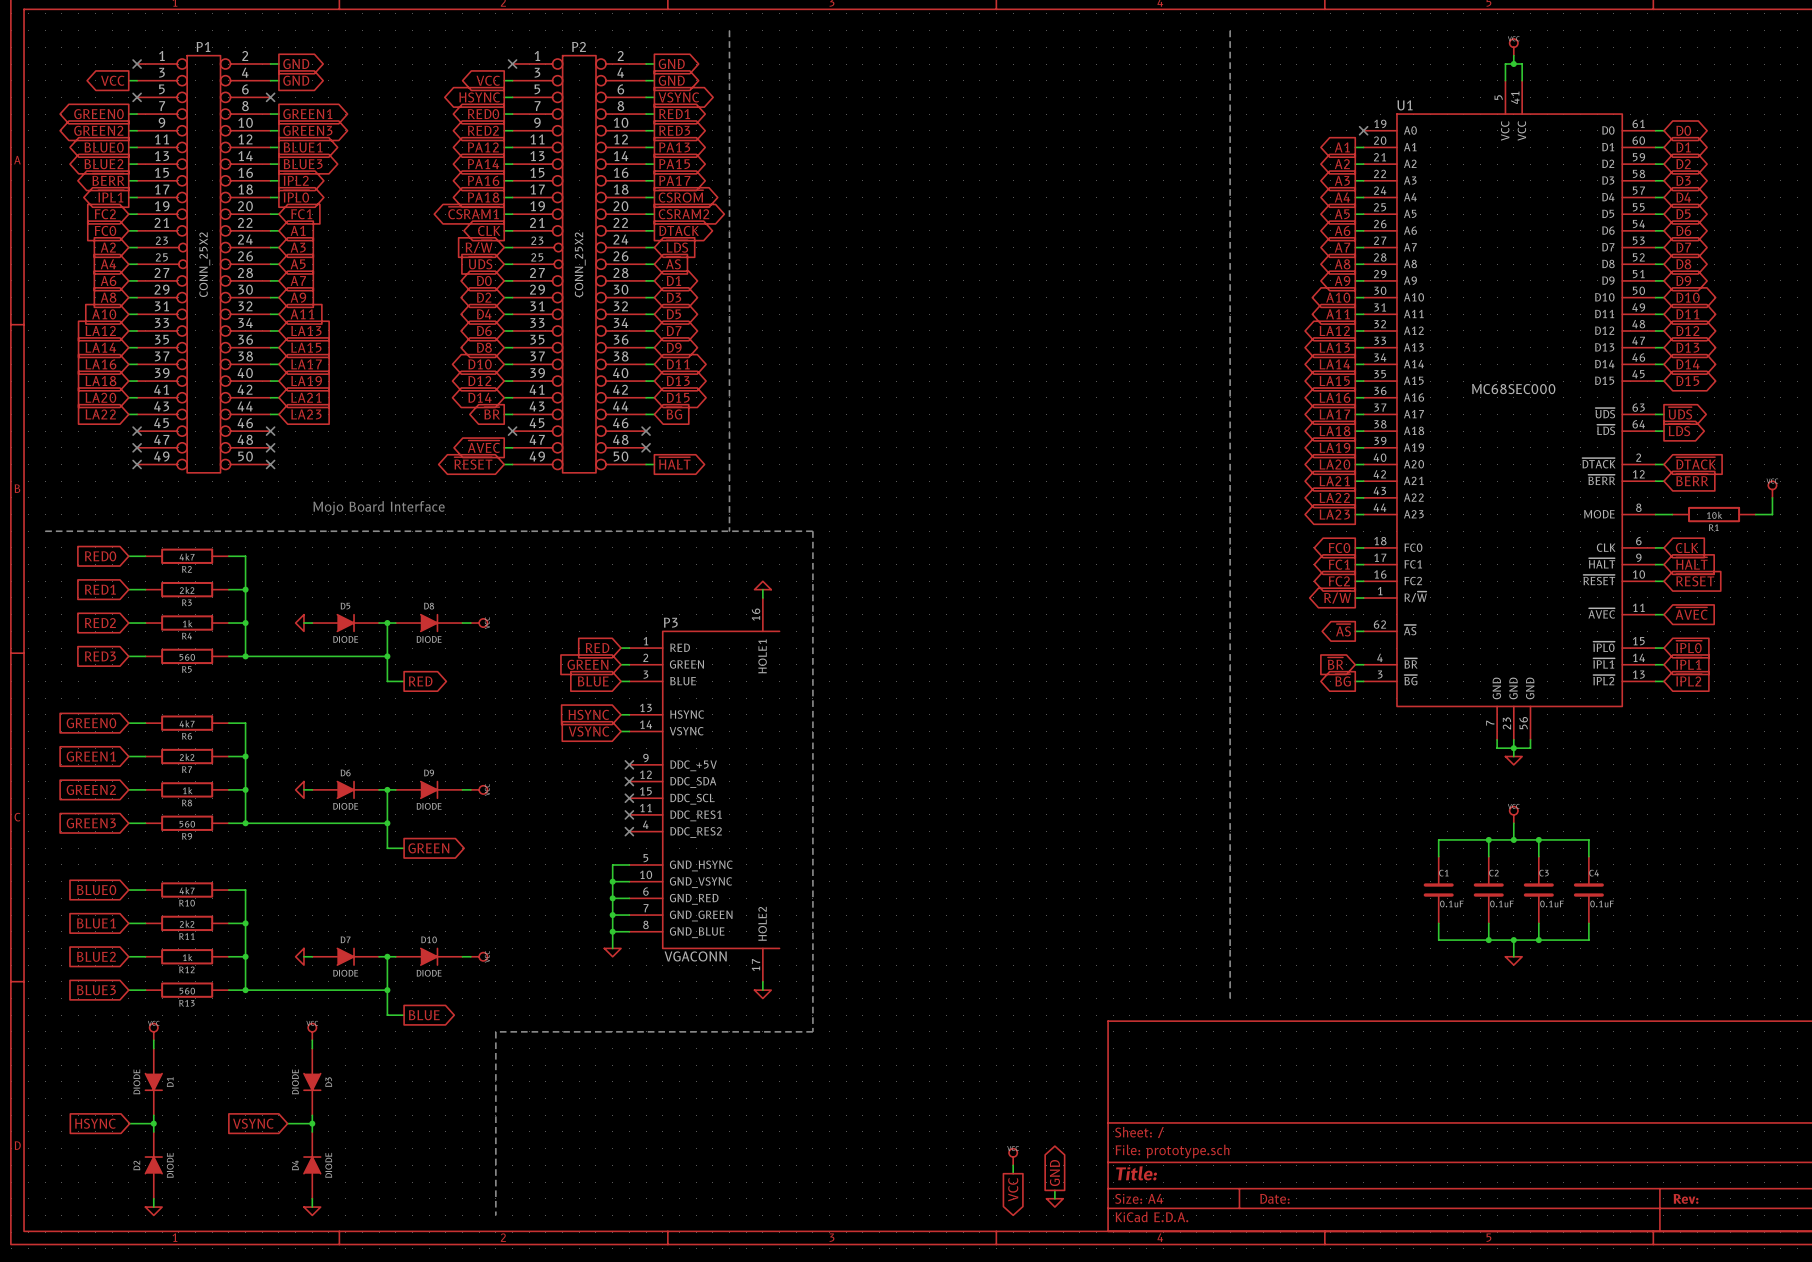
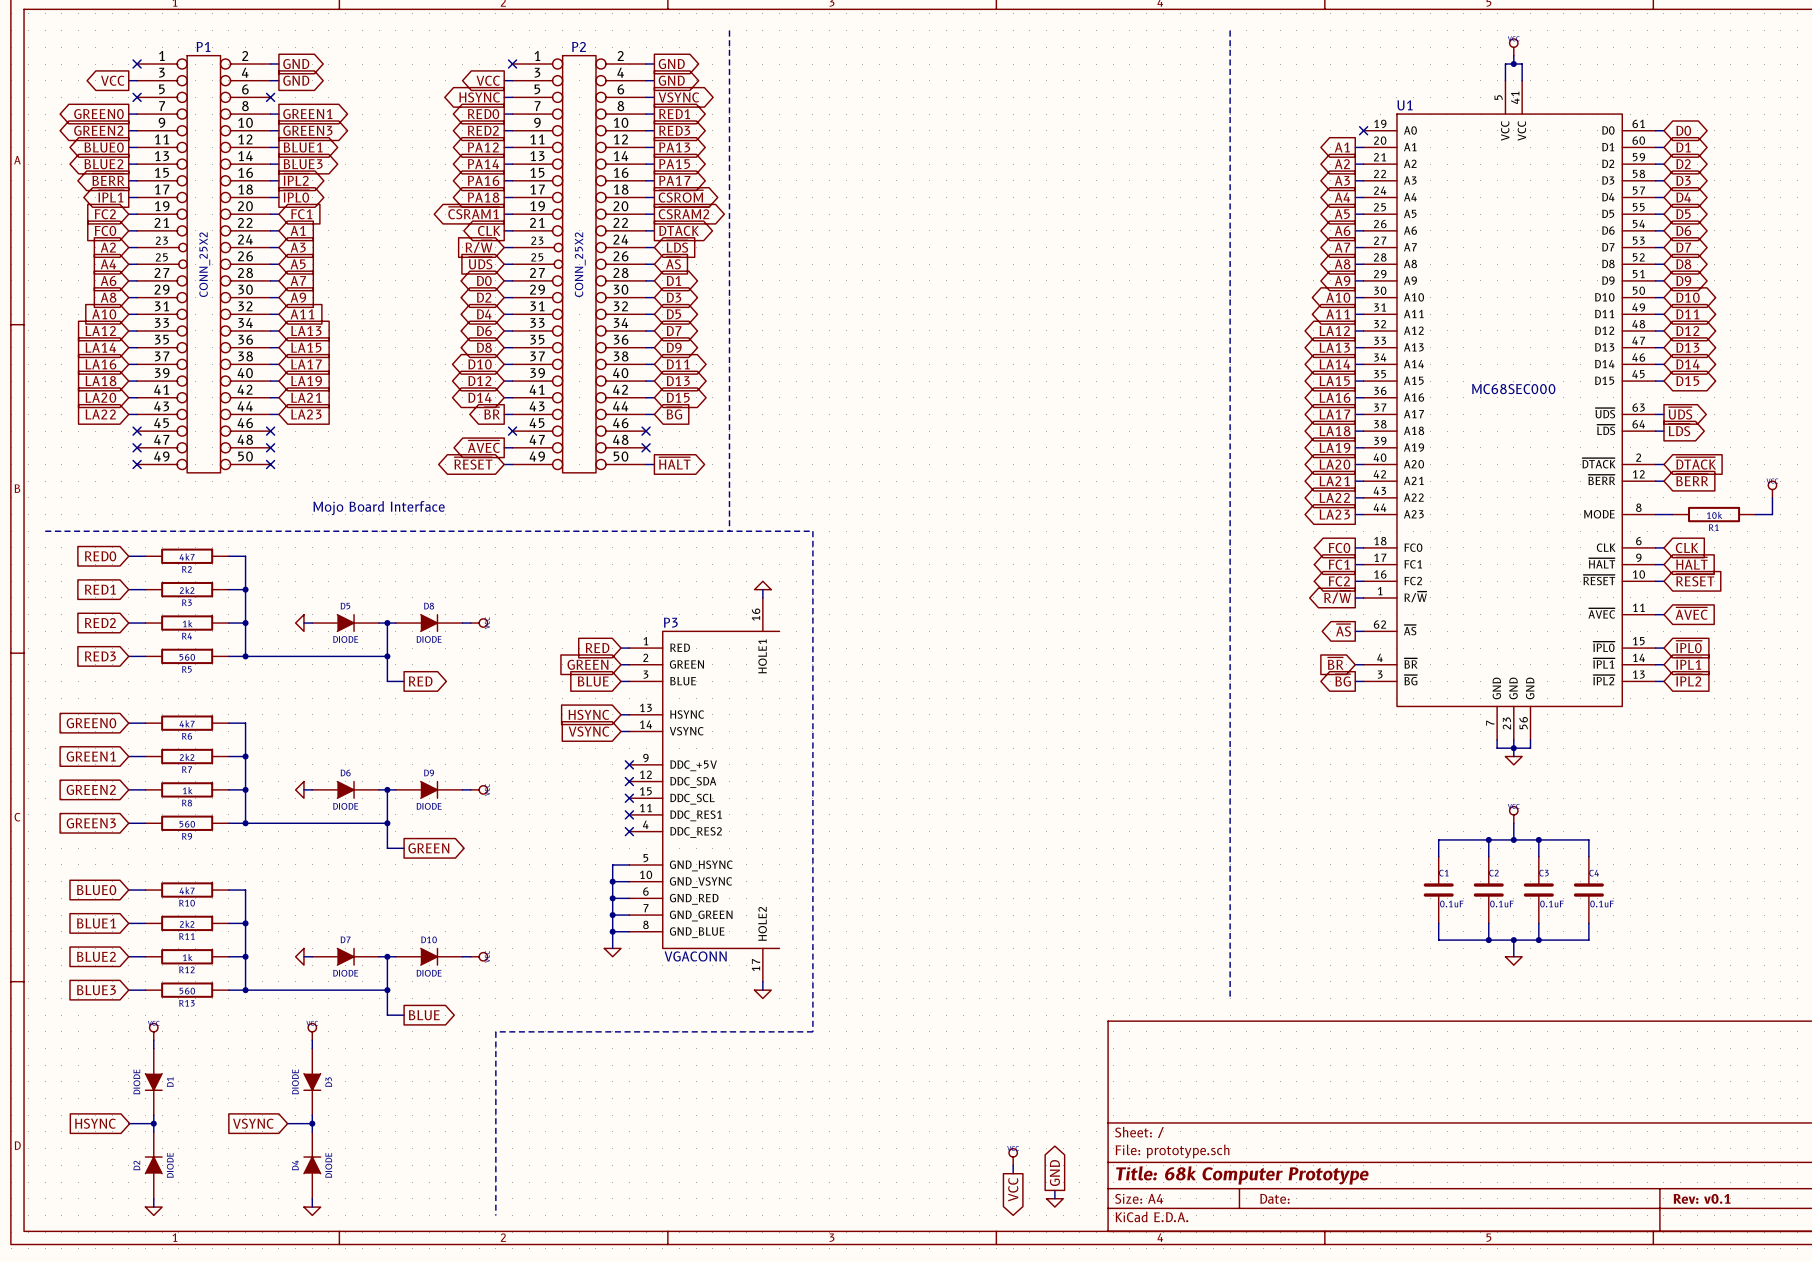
title block: Title: (1136, 1173) -> Title: 68k Computer Prototype (1242, 1175)
title block: Rev: (1686, 1198) -> Rev: v0.1 (1702, 1198)

